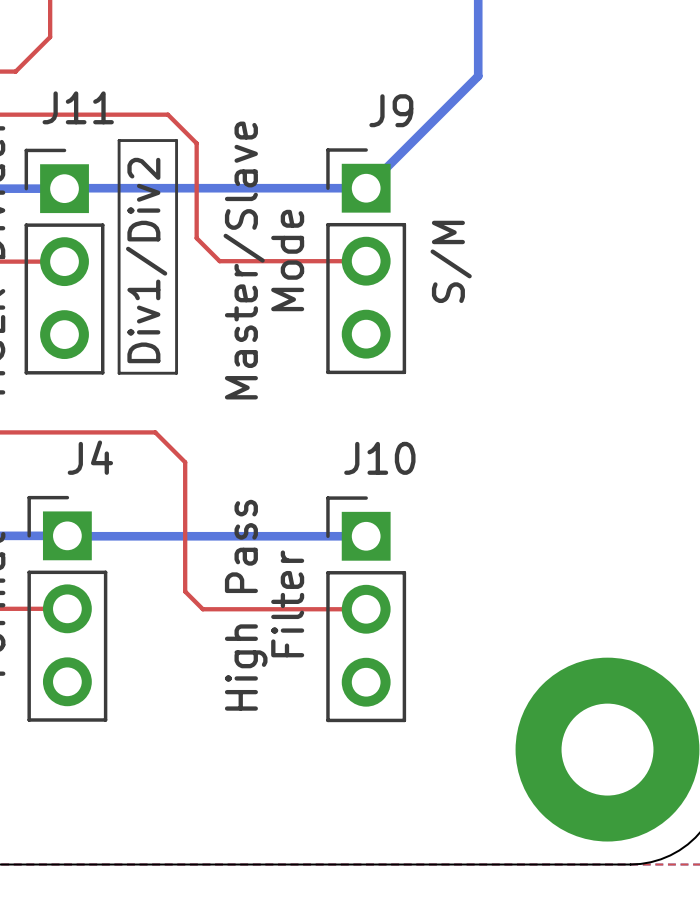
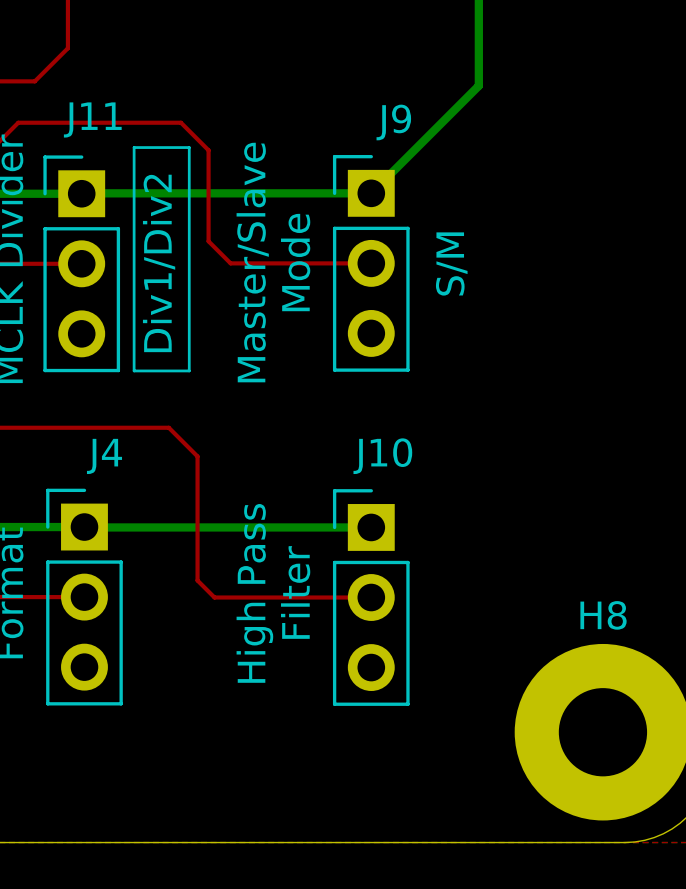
H8 name: none -> H8 (603, 615)

